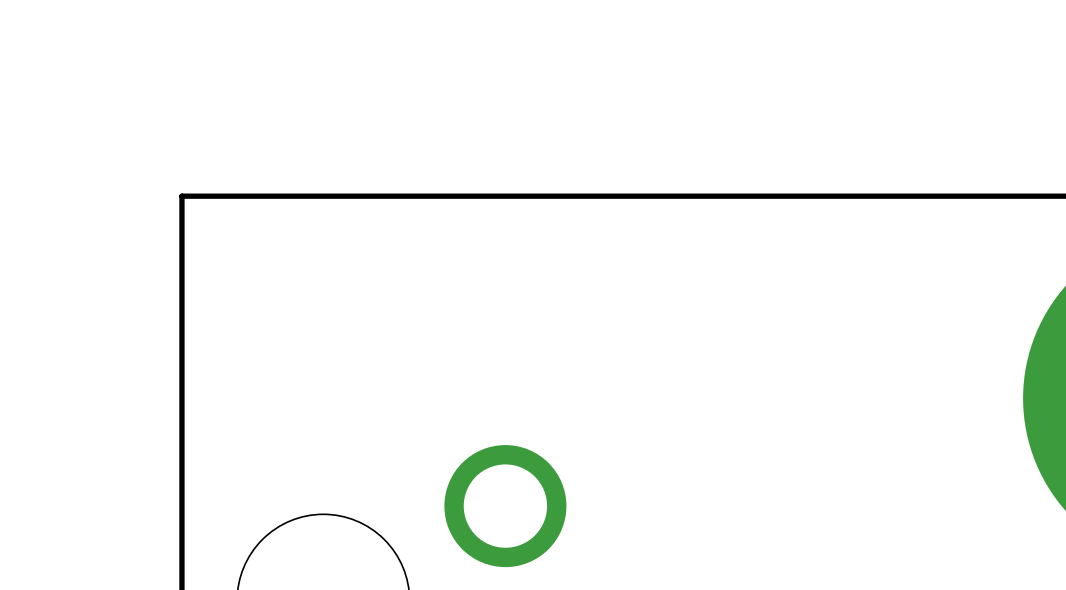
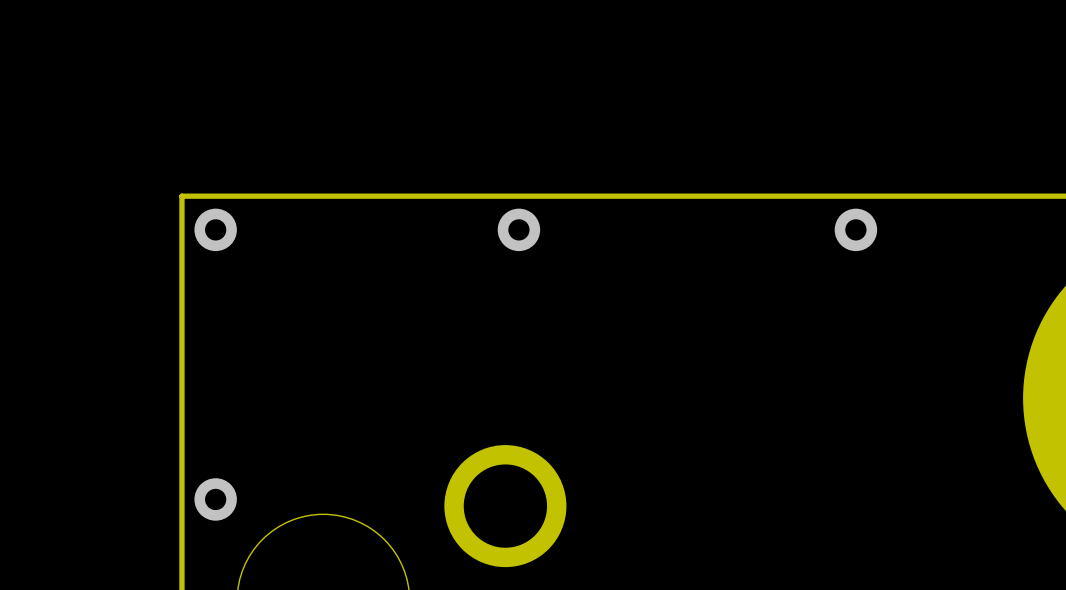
via: none -> (215, 229)
via: none -> (518, 229)
via: none -> (855, 229)
via: none -> (215, 499)

